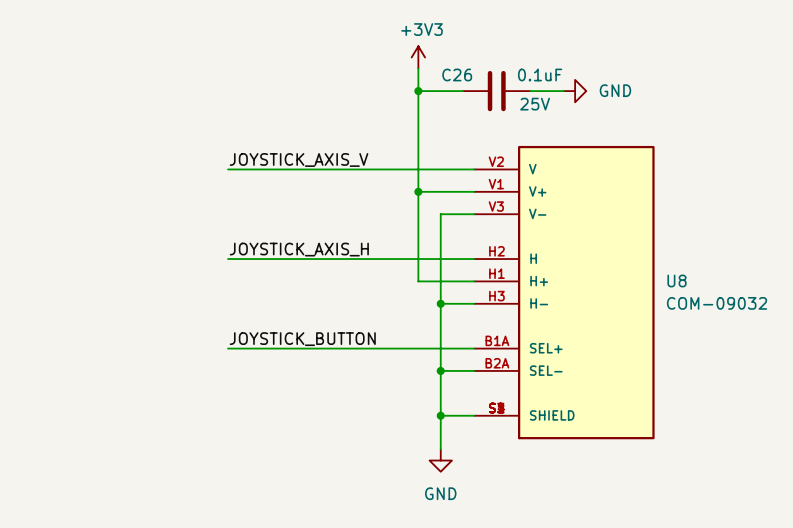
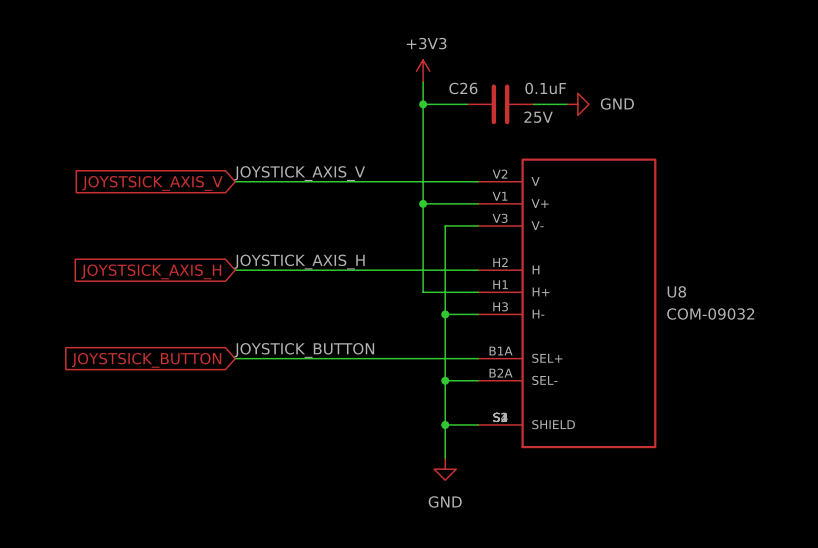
global label: none -> JOYSTSICK_AXIS_V (152, 183)
global label: none -> JOYSTSICK_AXIS_H (151, 271)
global label: none -> JOYSTSICK_BUTTON (146, 360)

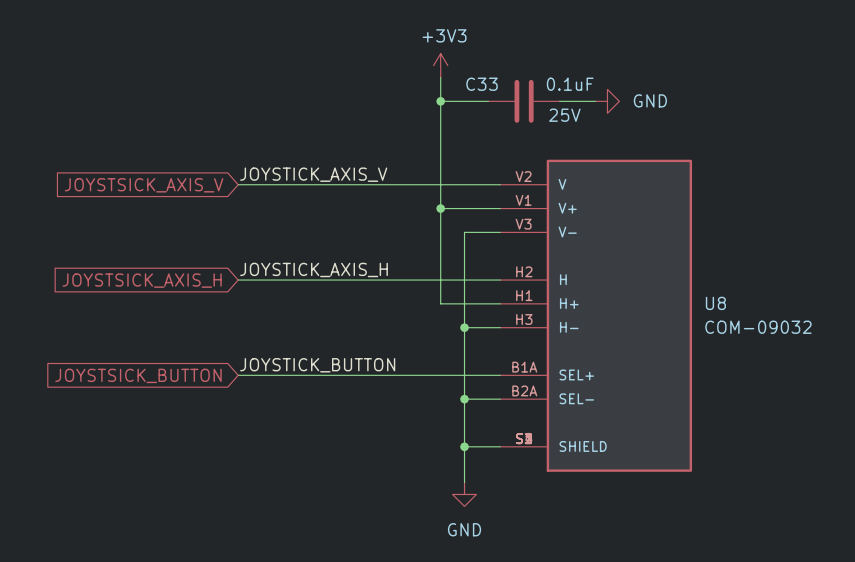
C26 name: C26 (463, 88) -> C33 (482, 84)

